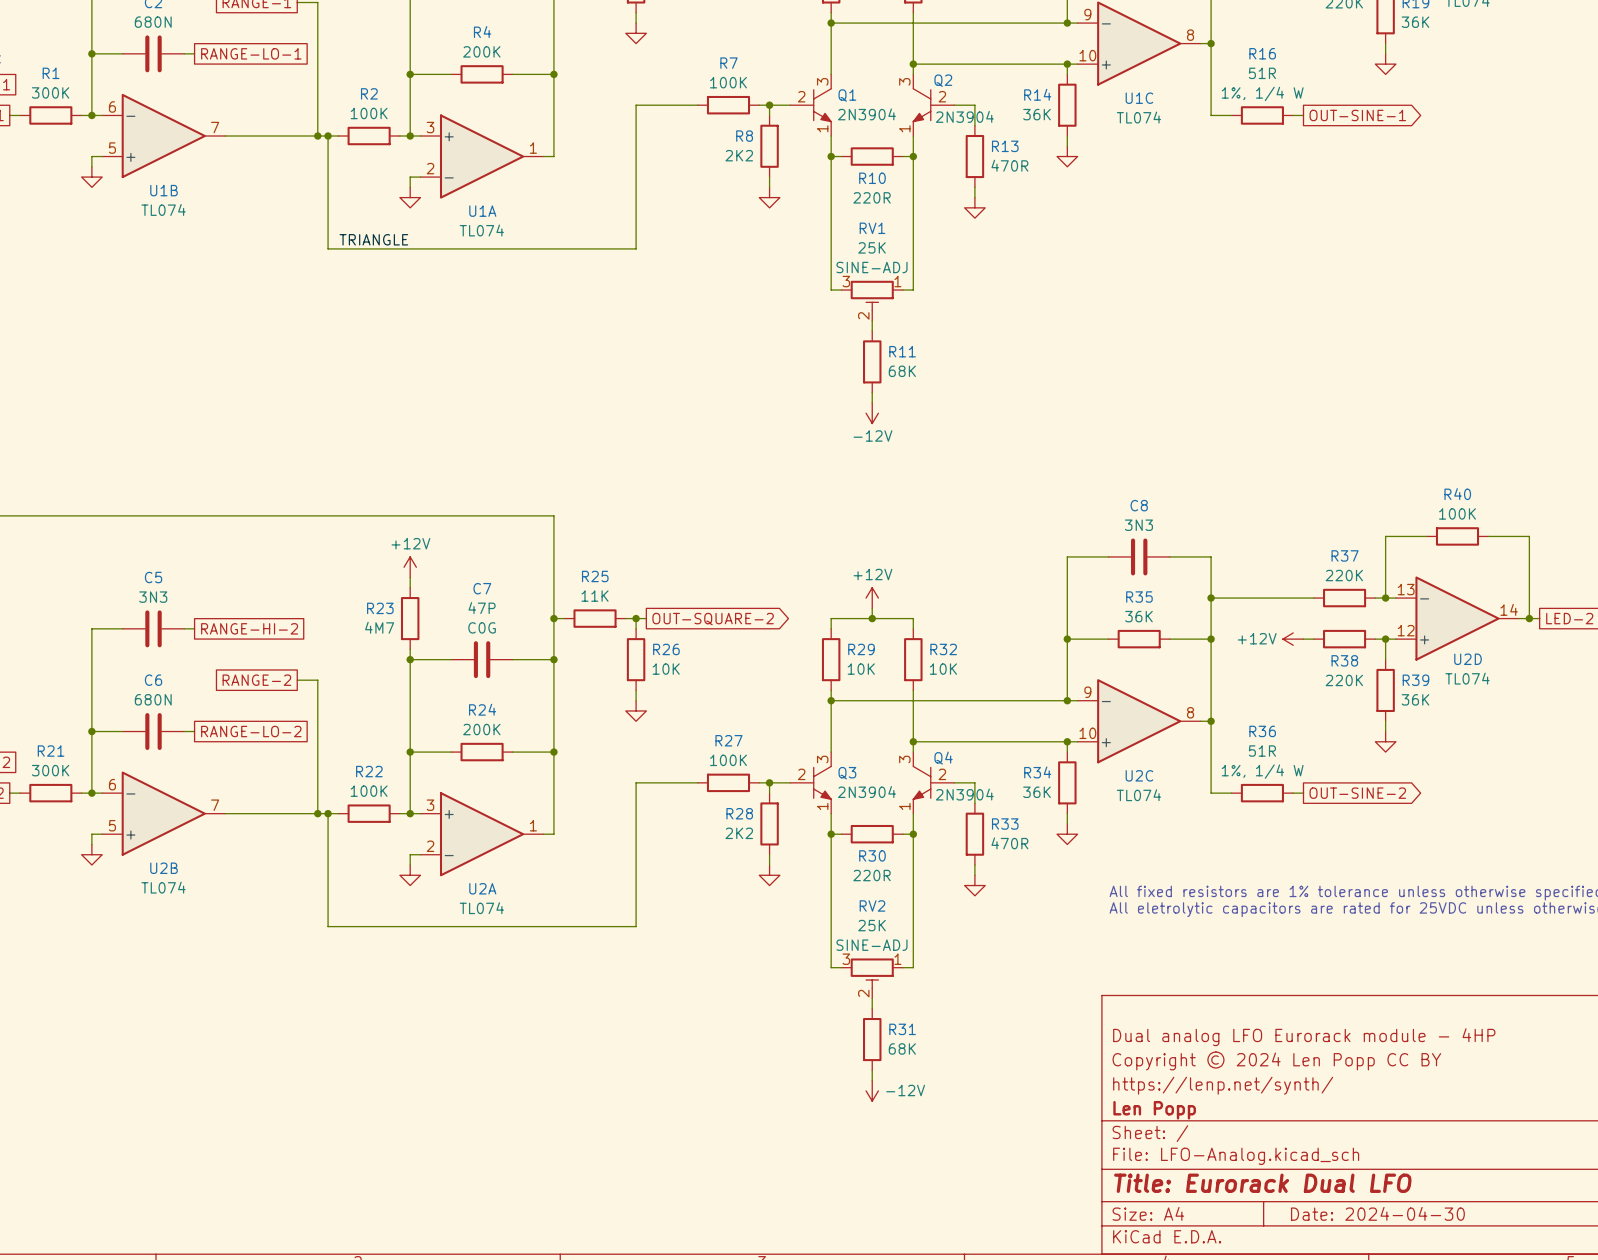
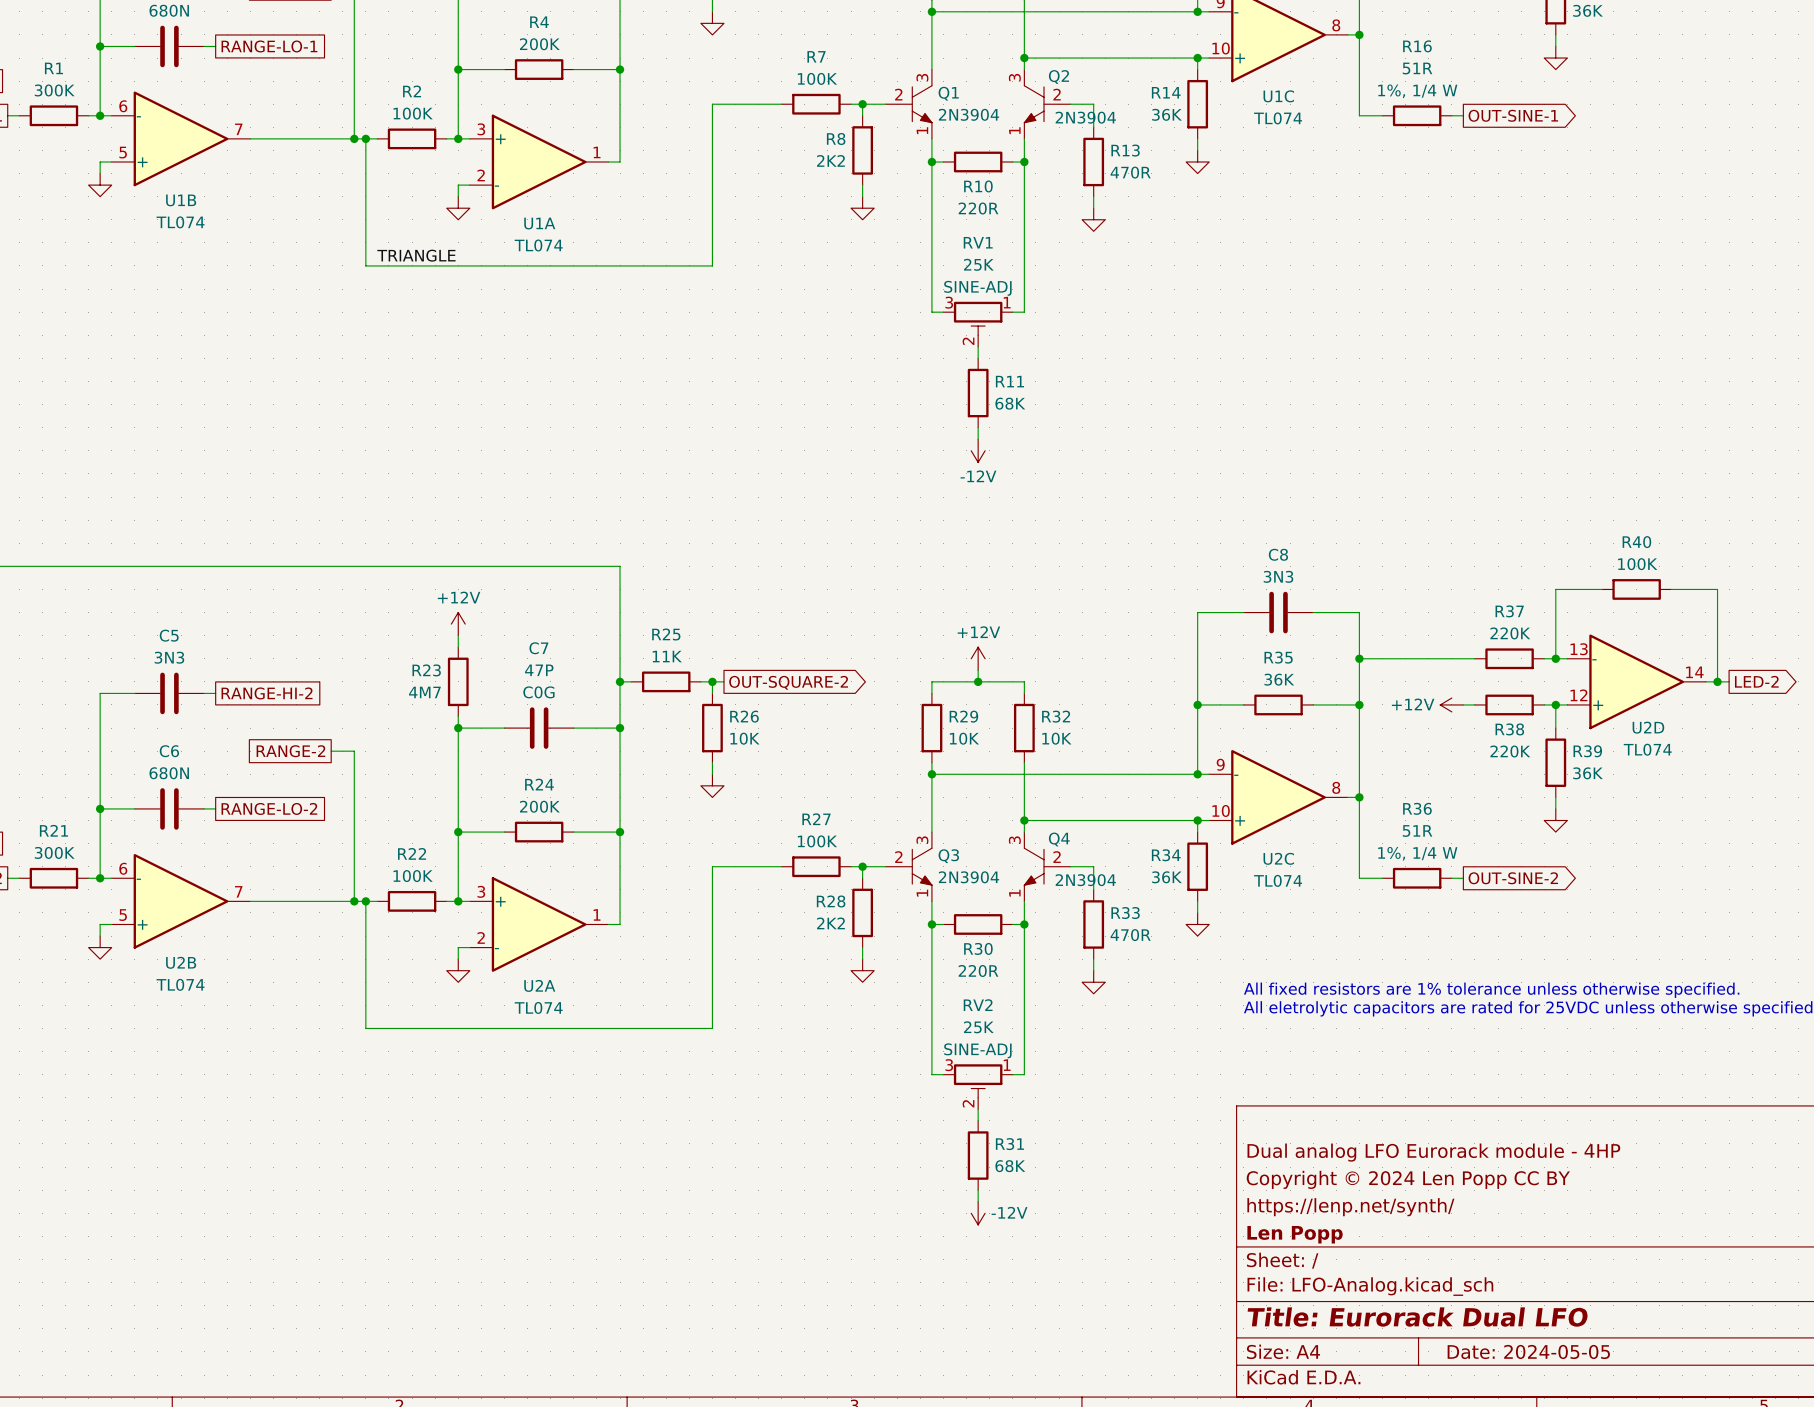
title block: Date: 2024-04-30 (1377, 1213) -> Date: 2024-05-05 (1528, 1351)

